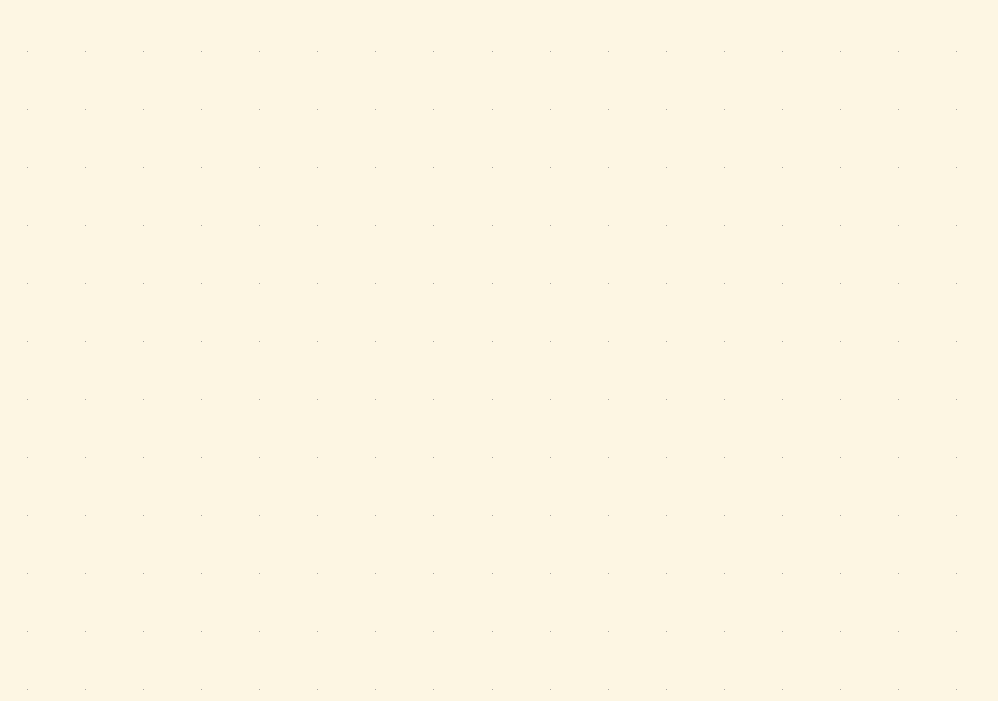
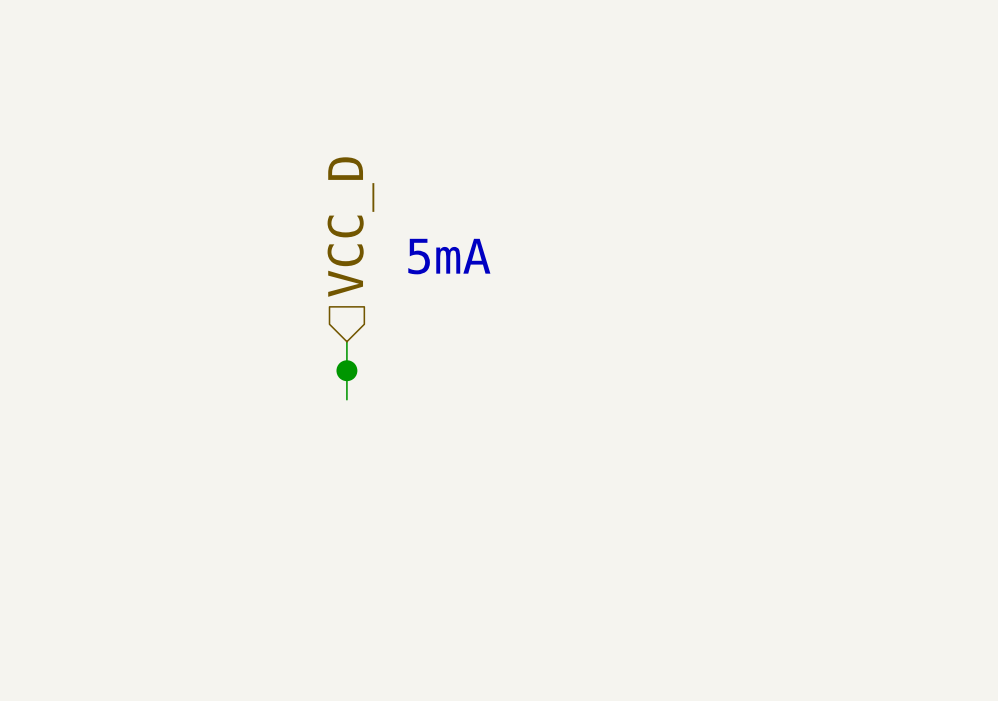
hierarchical label: none -> VCC_D (350, 227)
text: none -> 5mA (449, 256)
wire: none -> (346, 341) (346, 399)
junction: none -> (346, 370)

